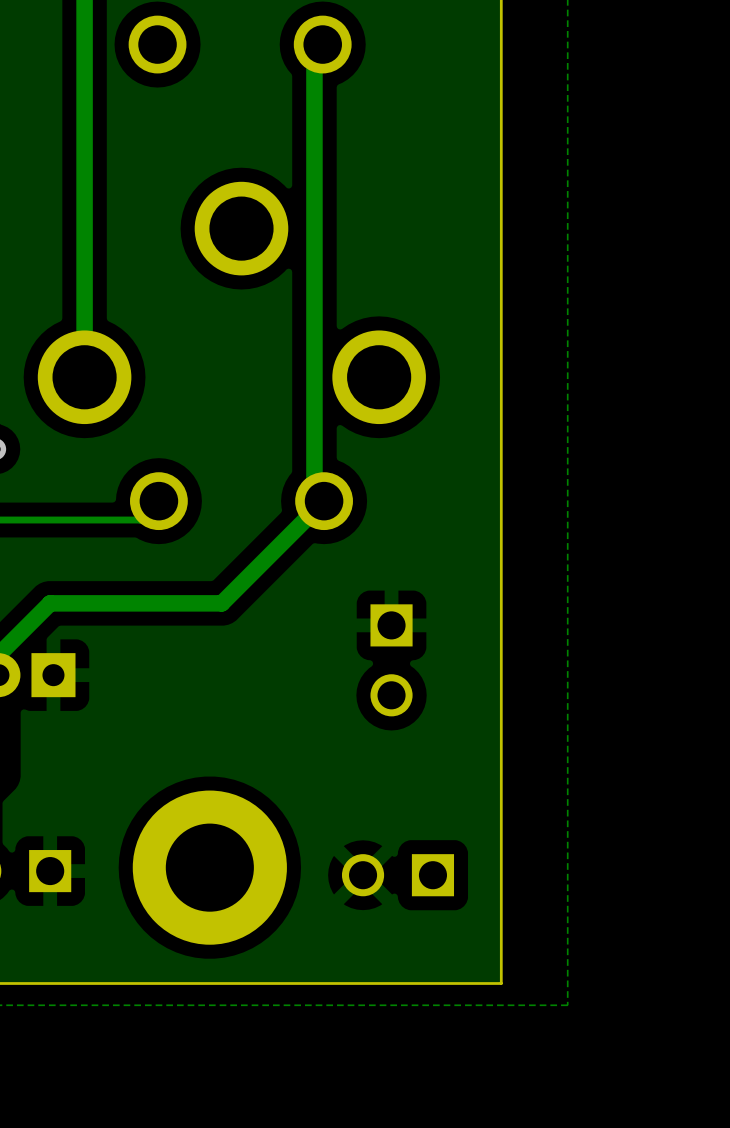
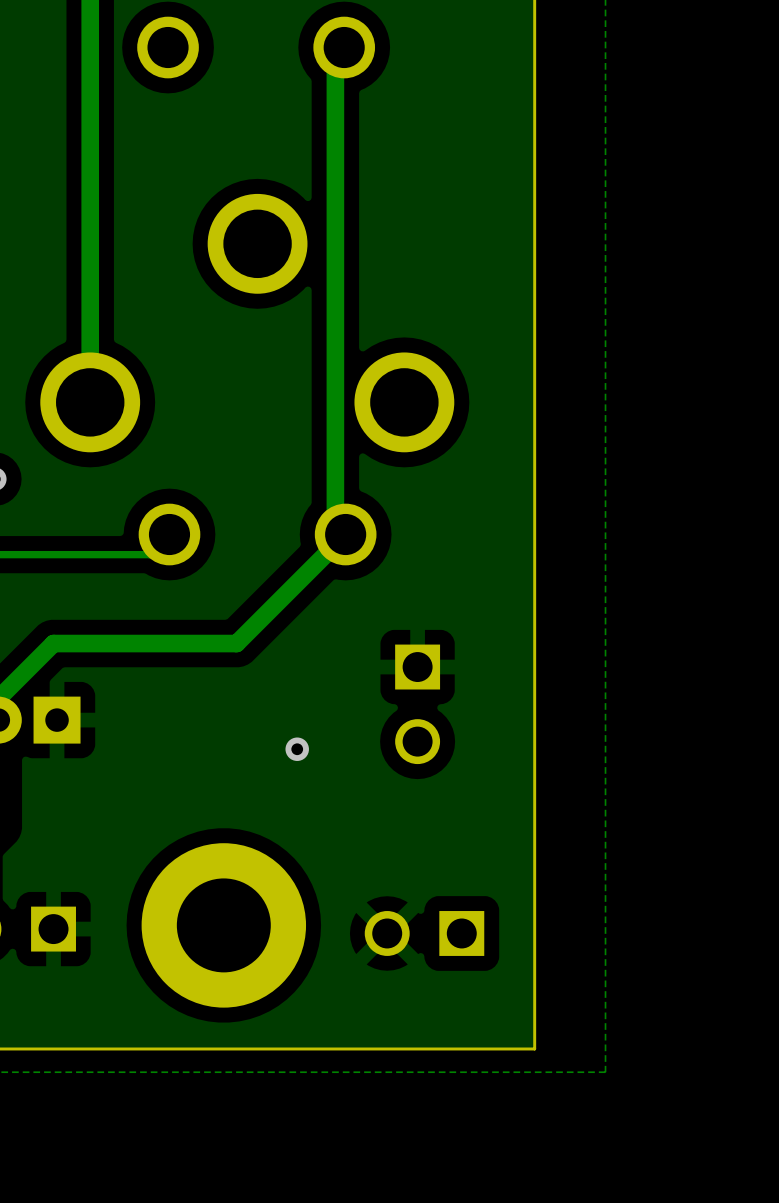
via: none -> (297, 749)

